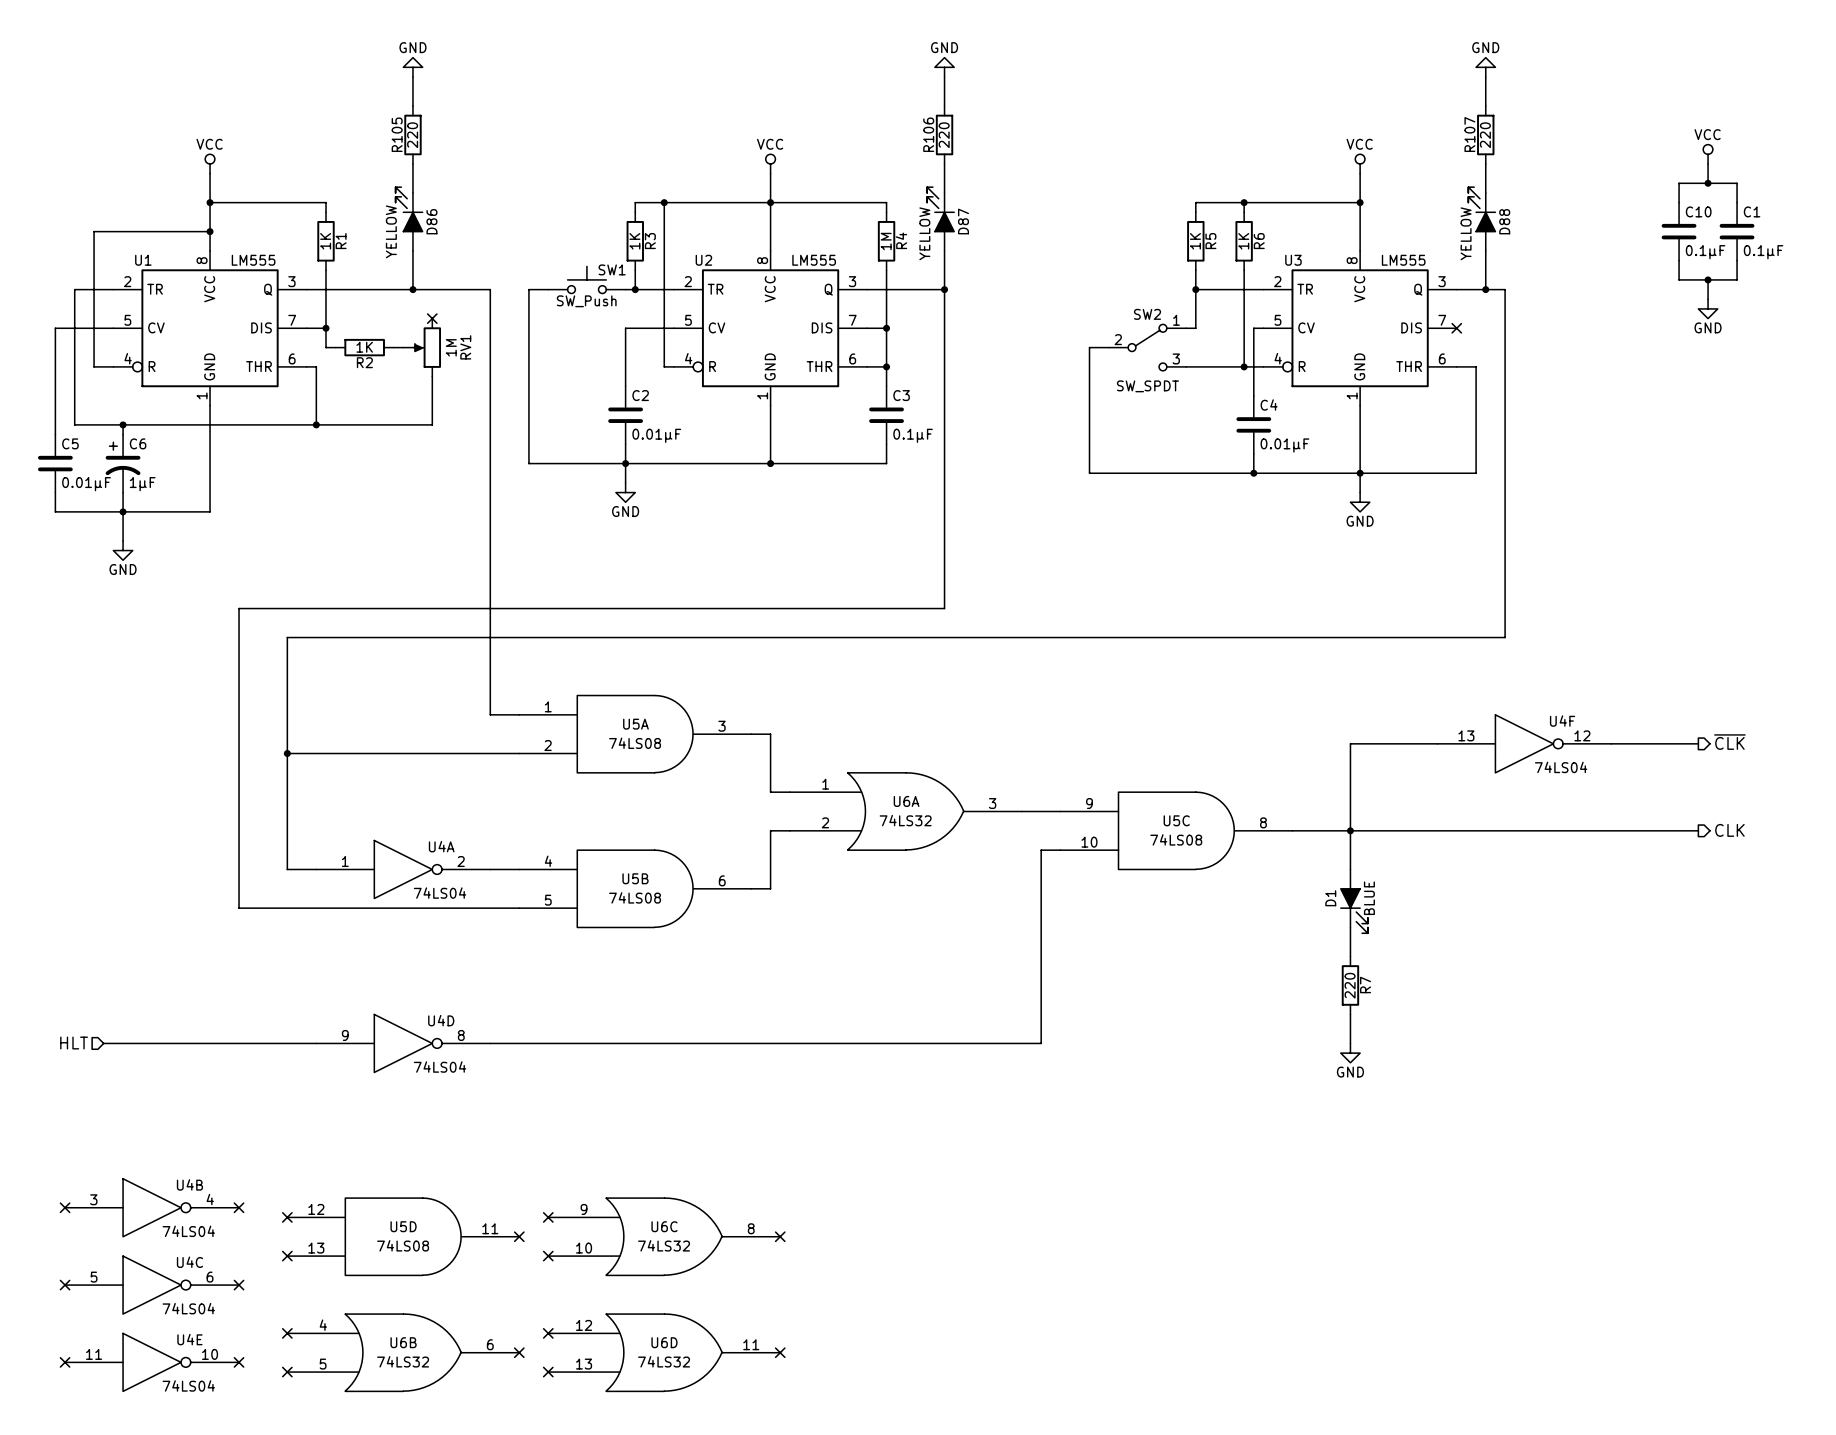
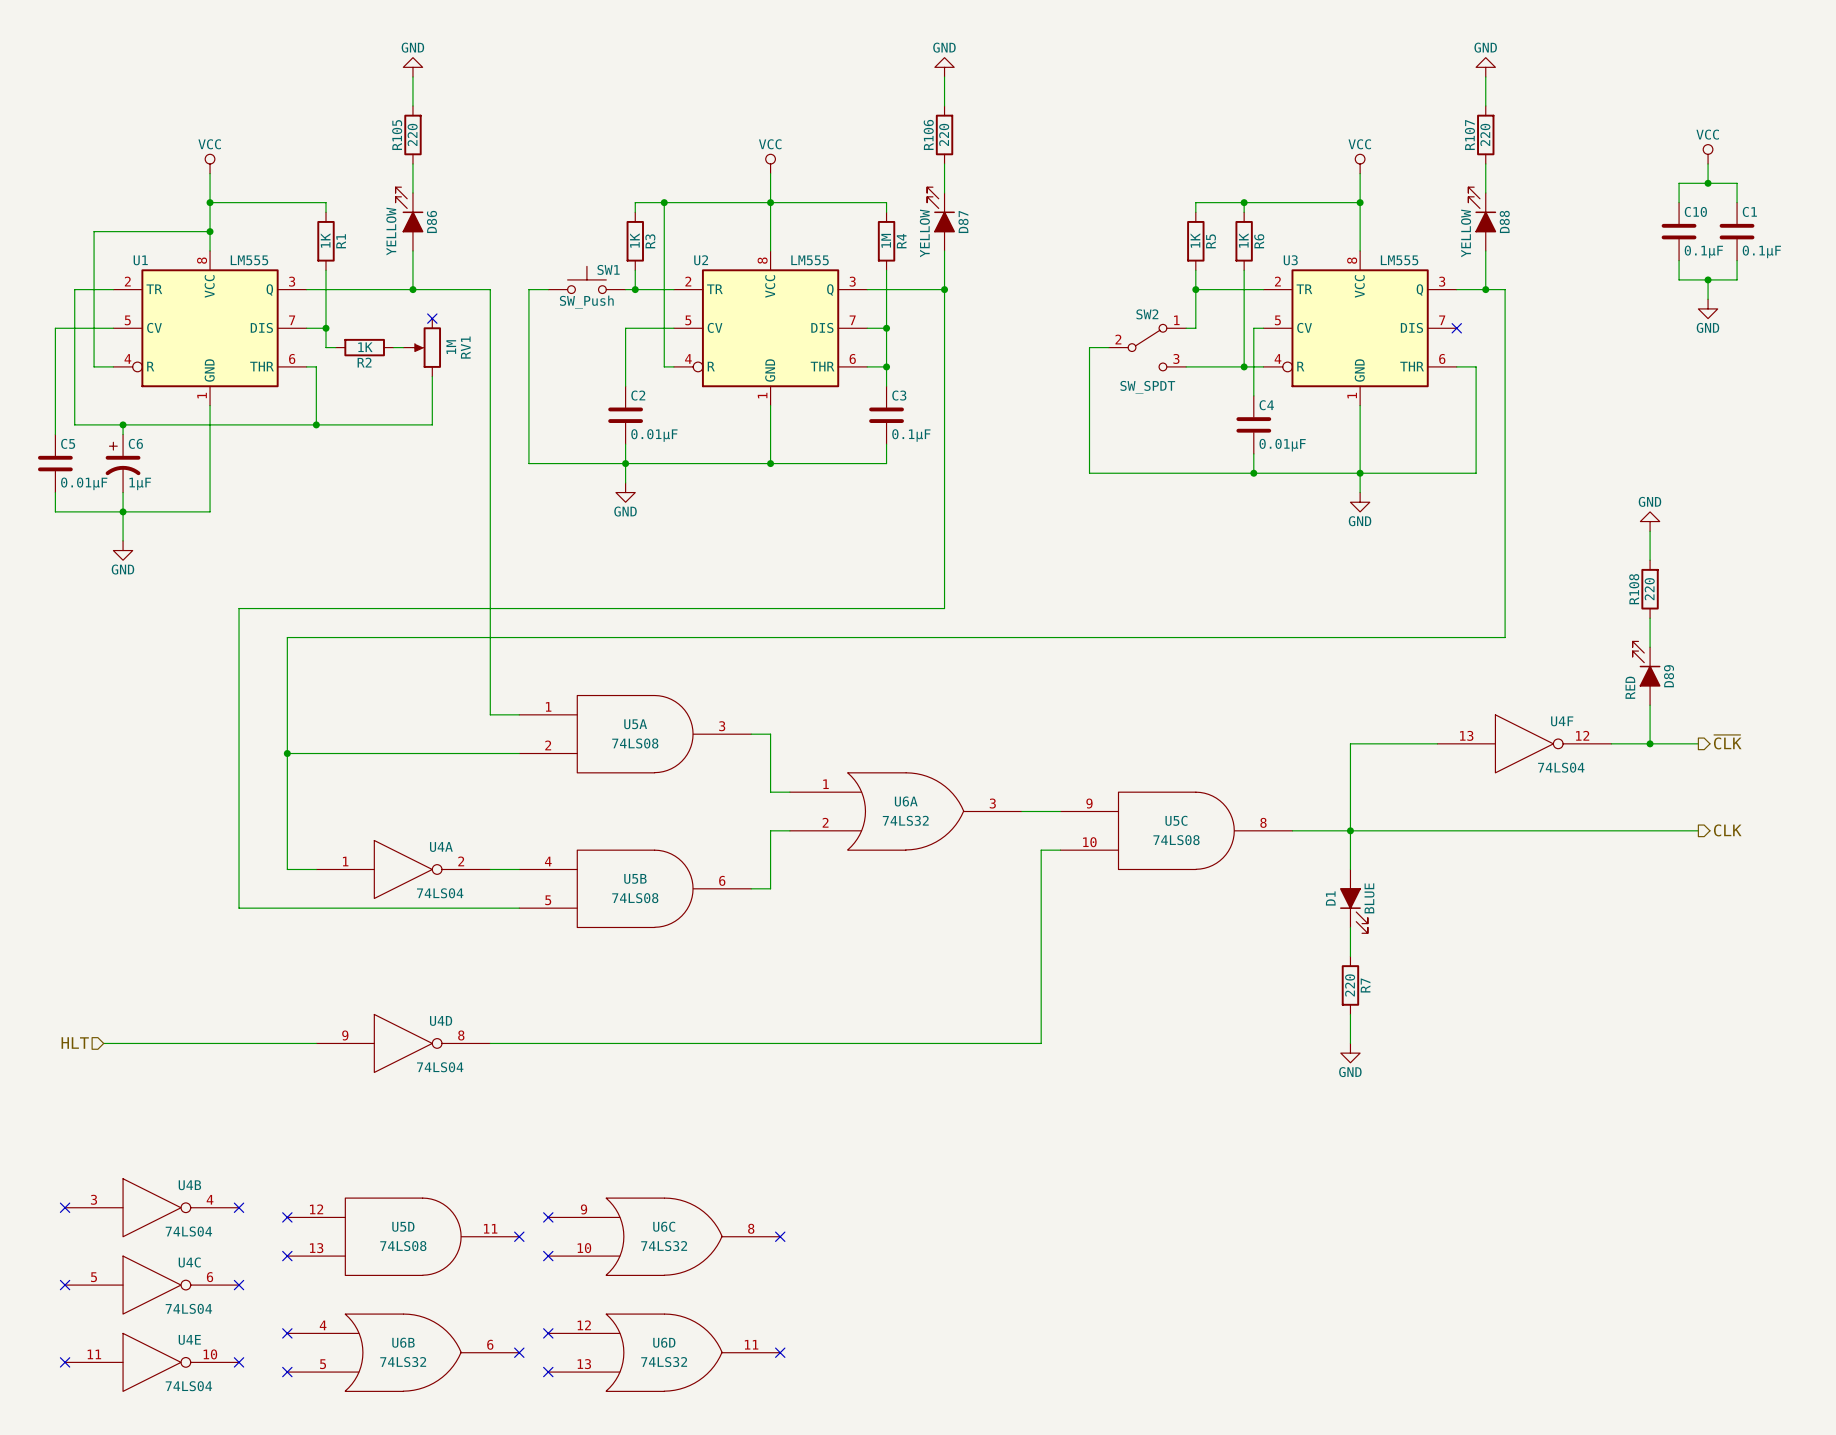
power symbol: none -> GND (1650, 521)
wire: none -> (1650, 531) (1650, 560)
R108: none -> 220 (1650, 589)
wire: none -> (1650, 618) (1650, 647)
D89: none -> RED (1646, 673)
wire: none -> (1650, 705) (1650, 743)
junction: none -> (1650, 743)

